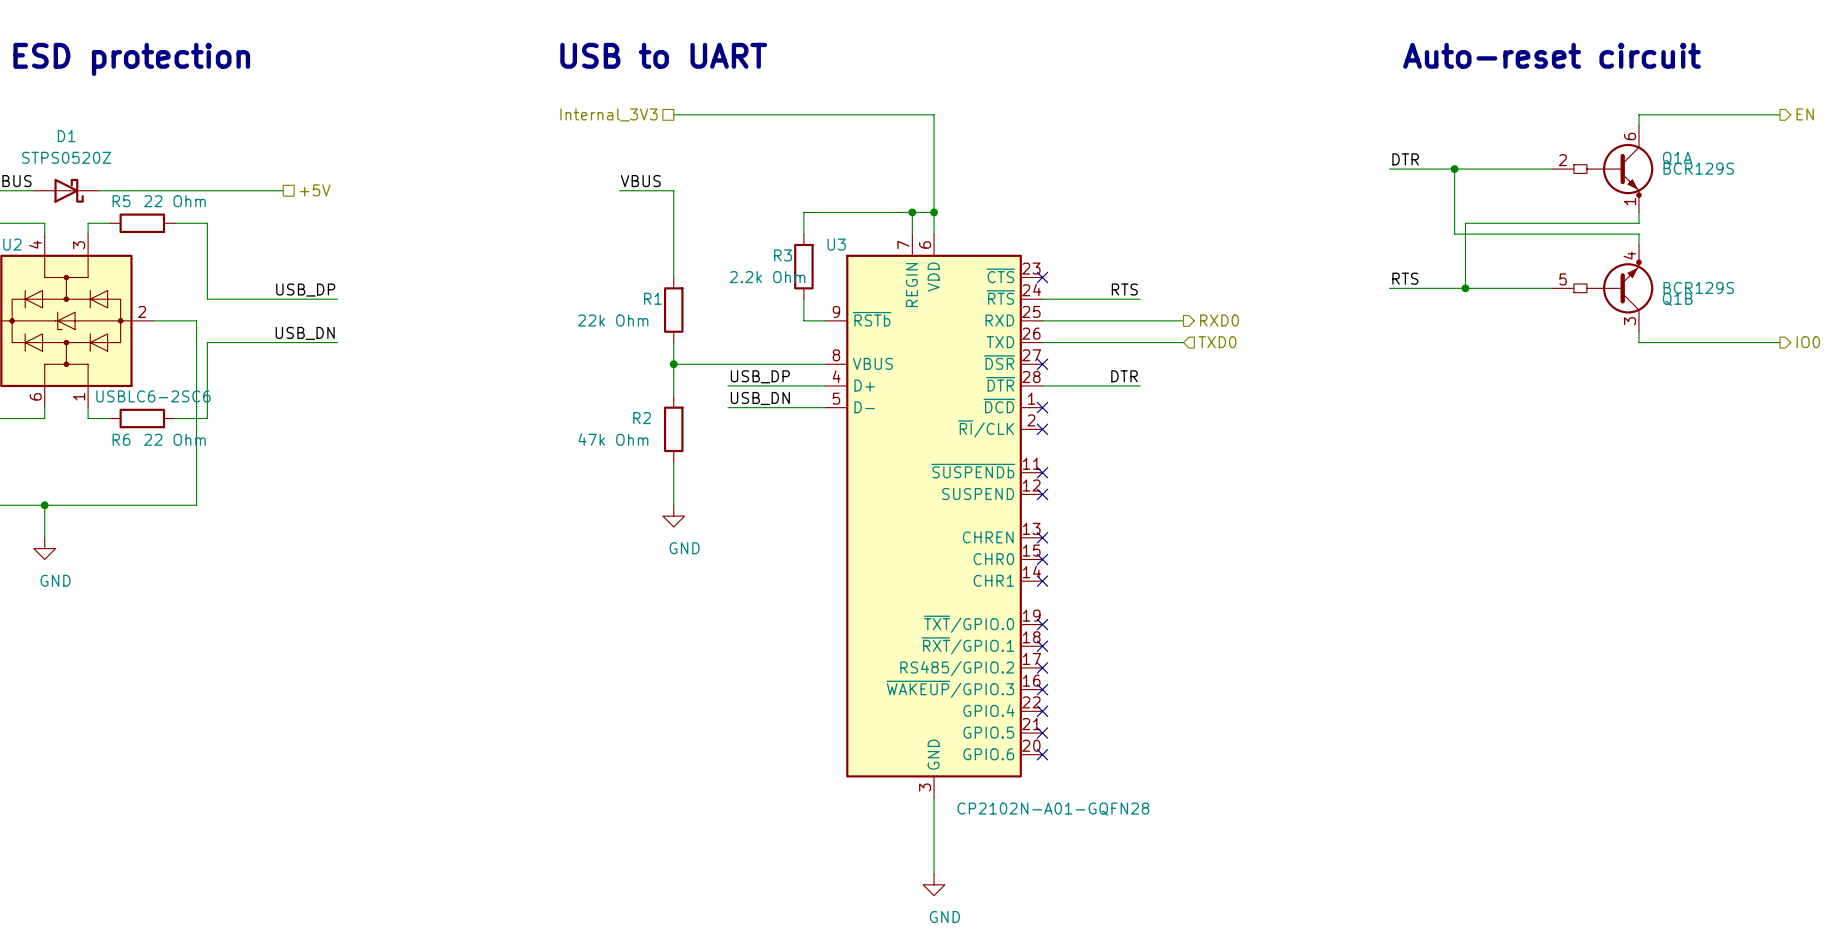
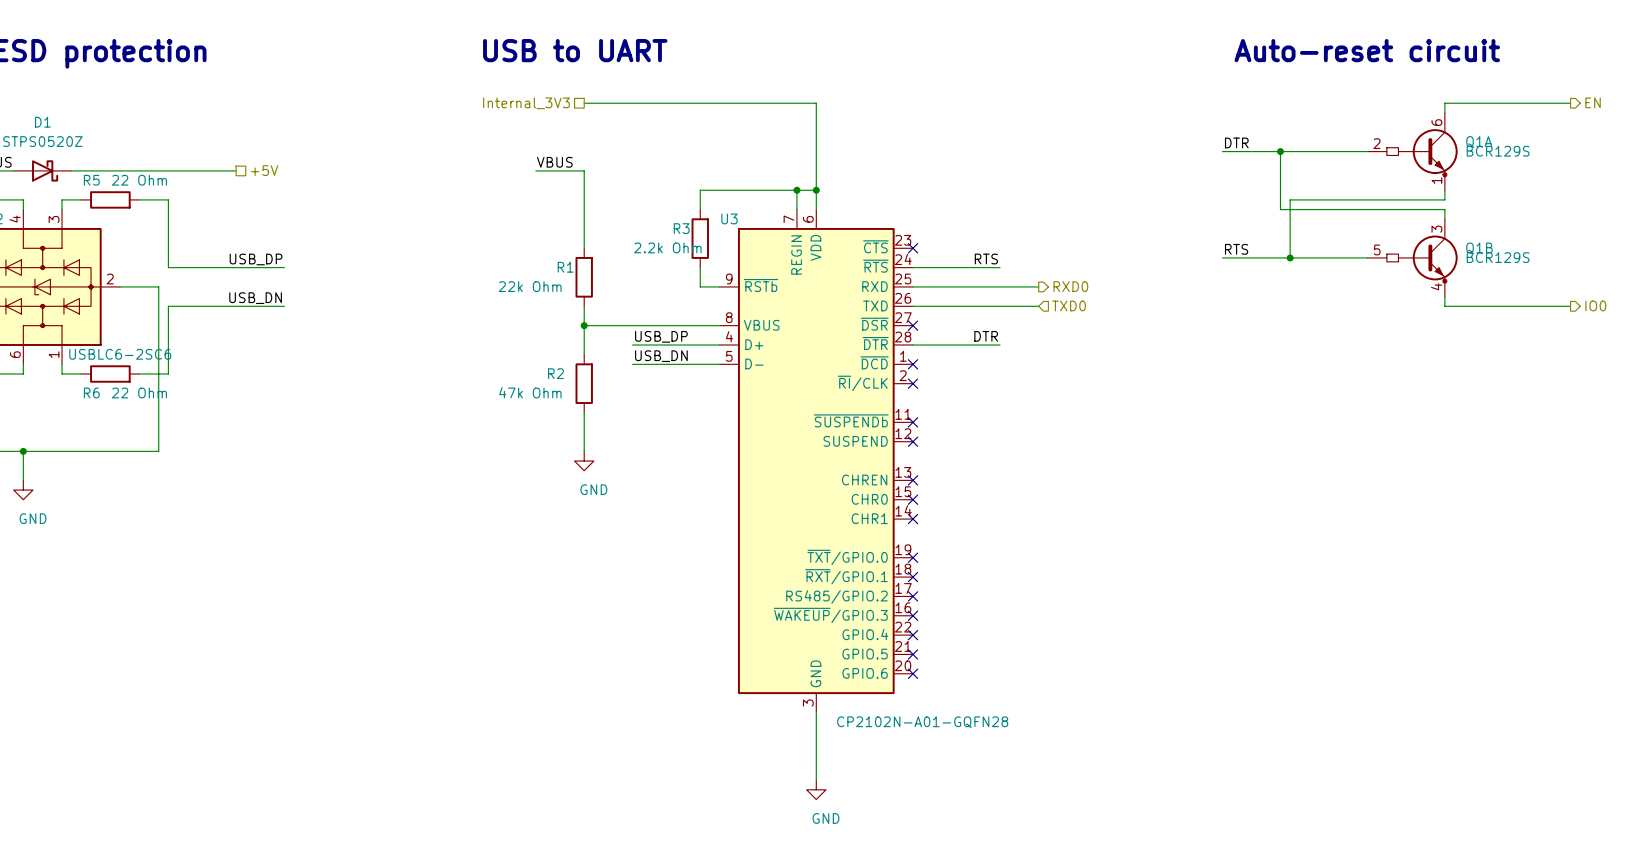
Q1B flip: as is (1613, 286) -> up-down (1422, 259)

